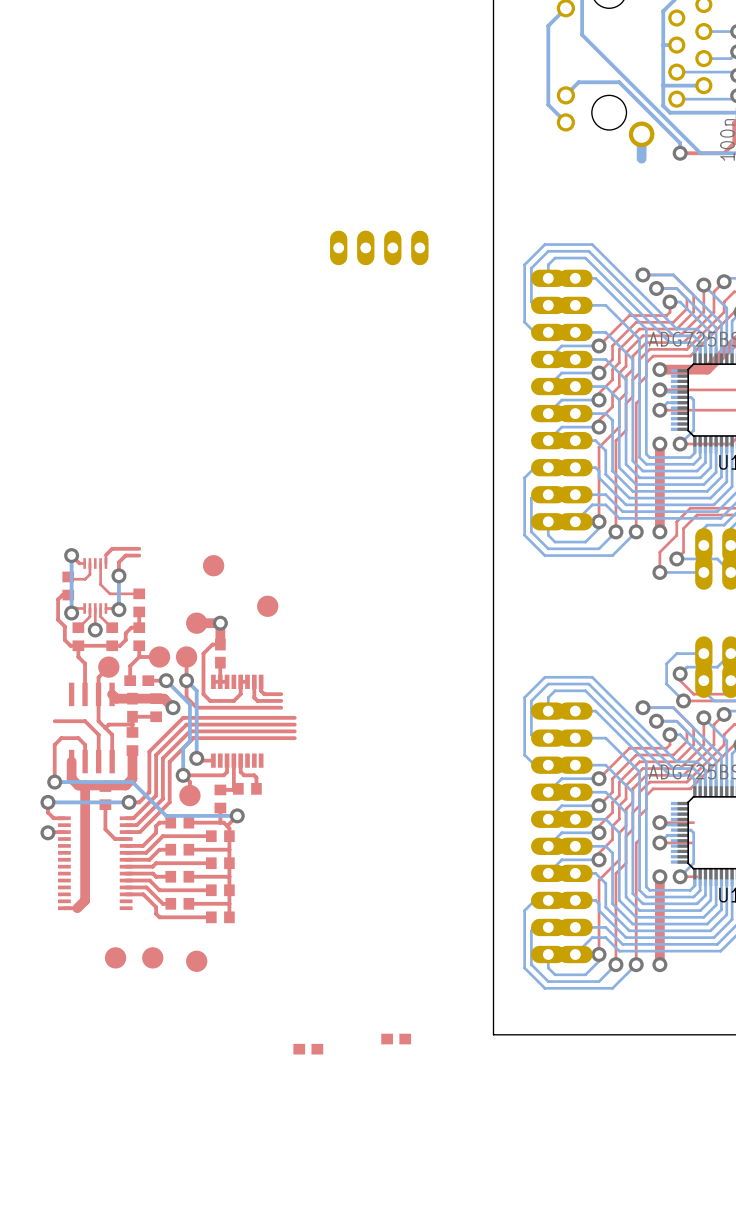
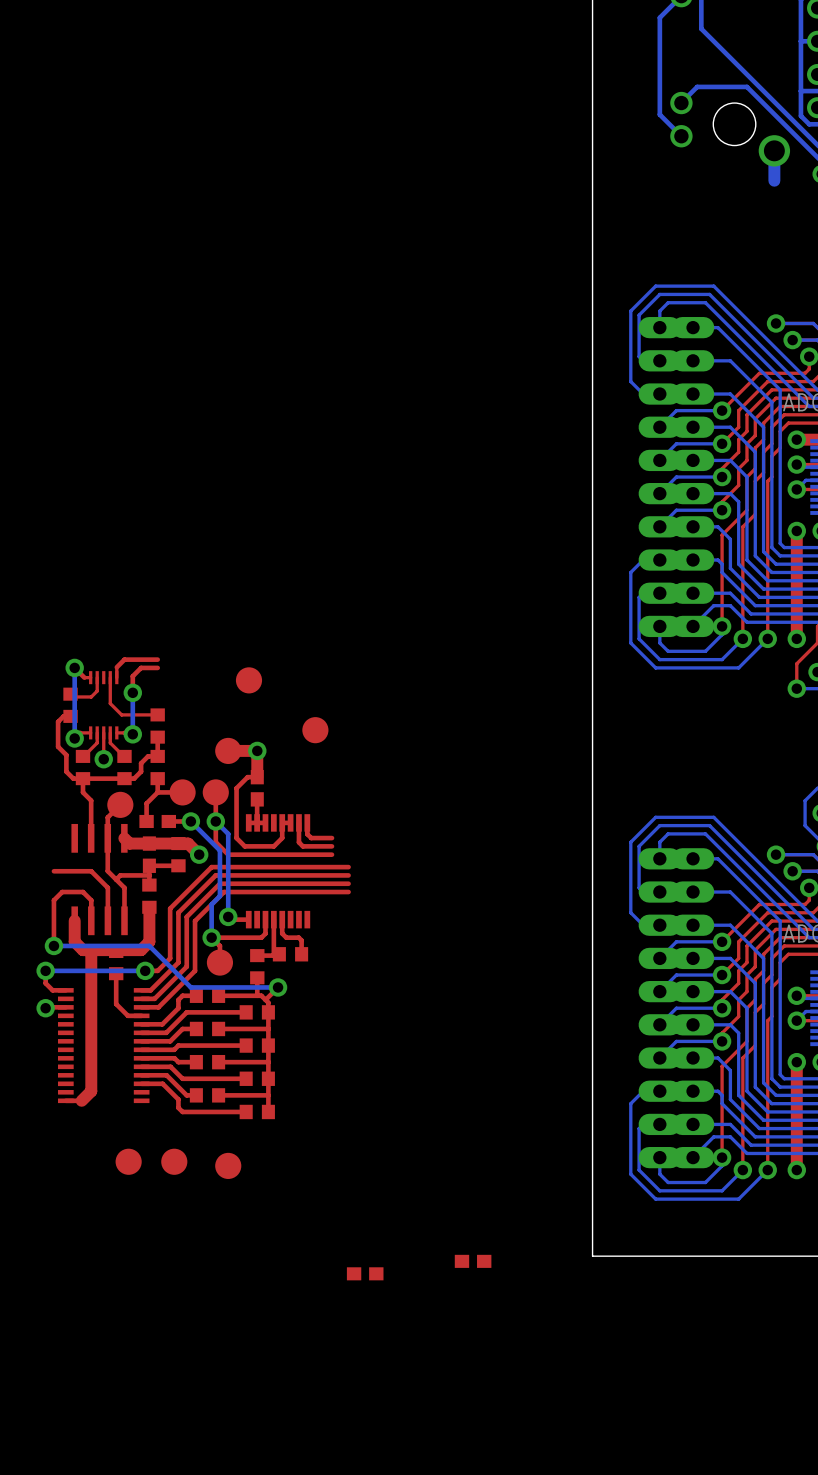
part: (379, 247) -> none

